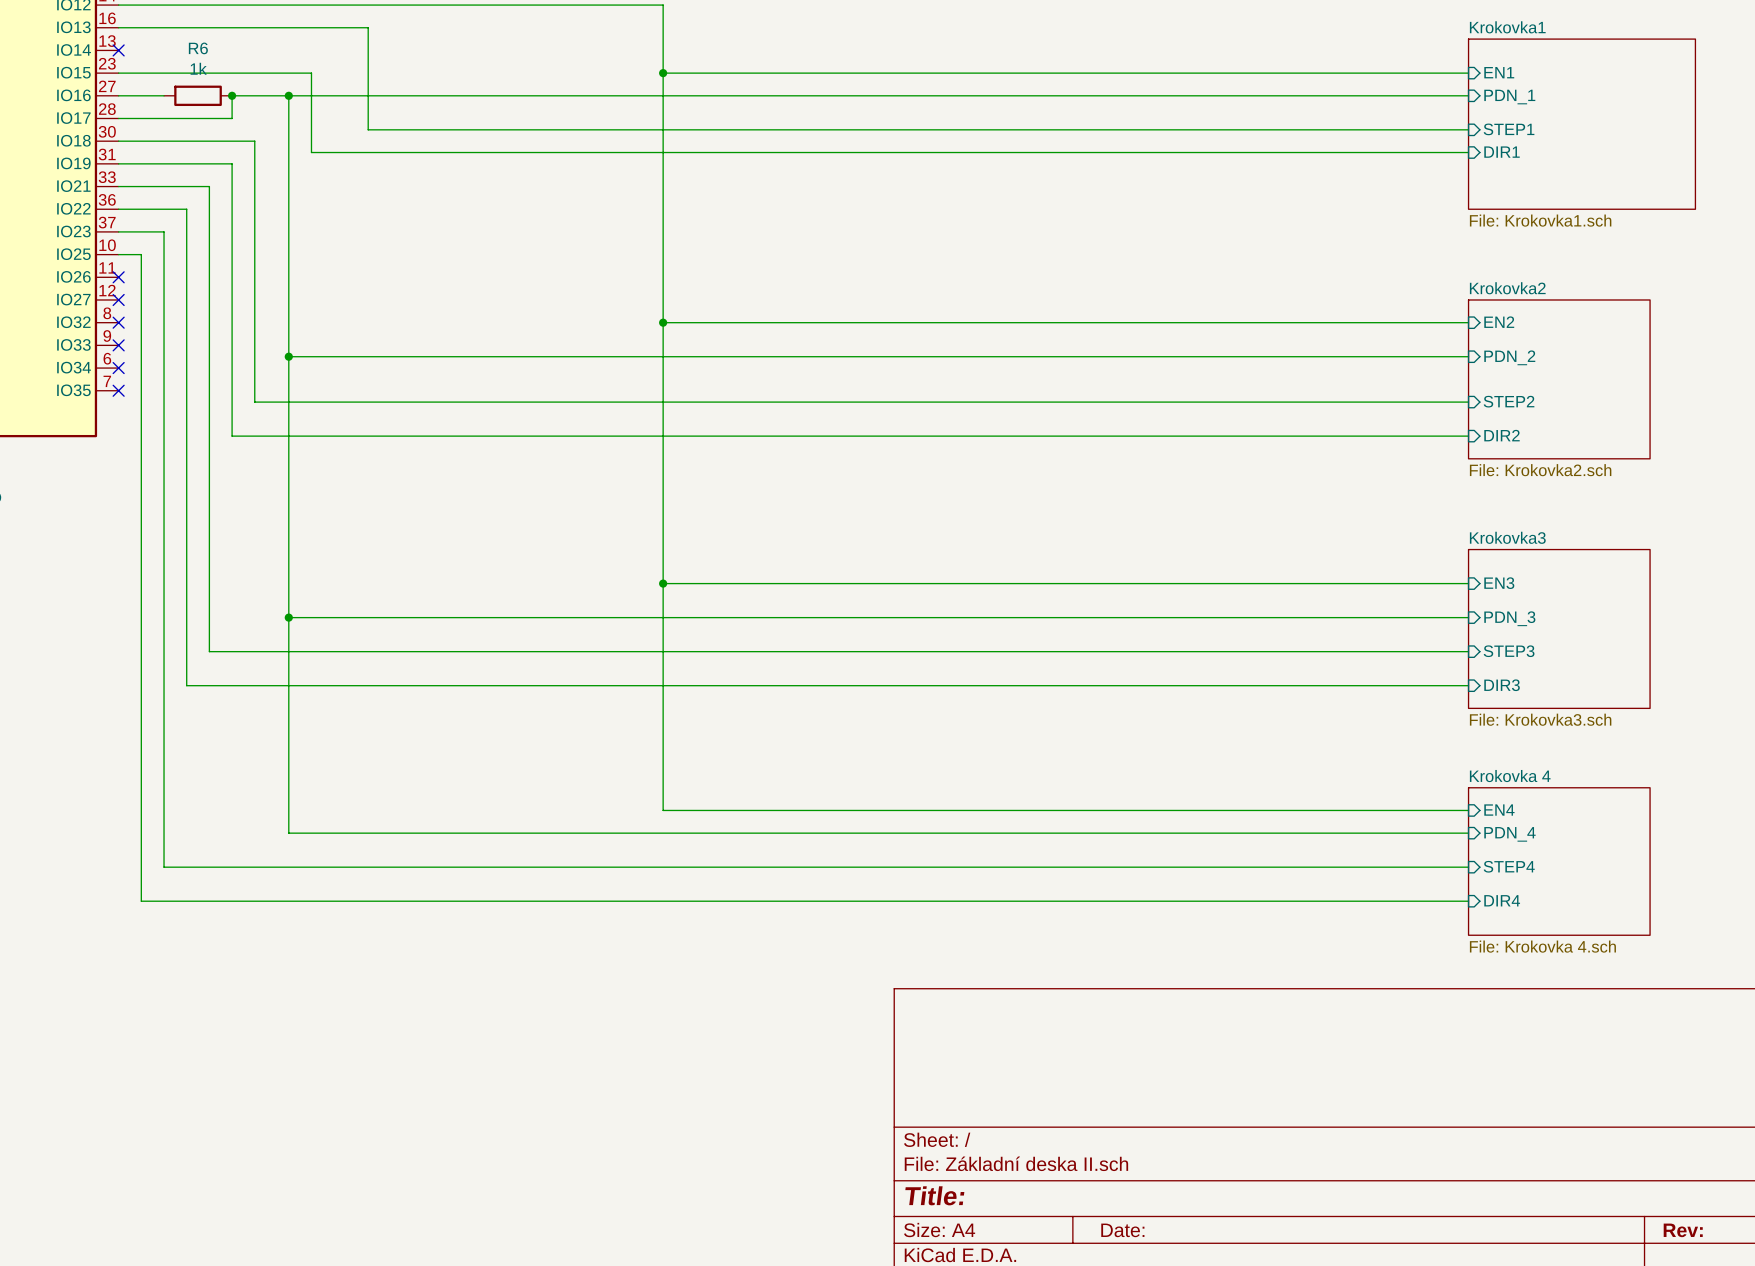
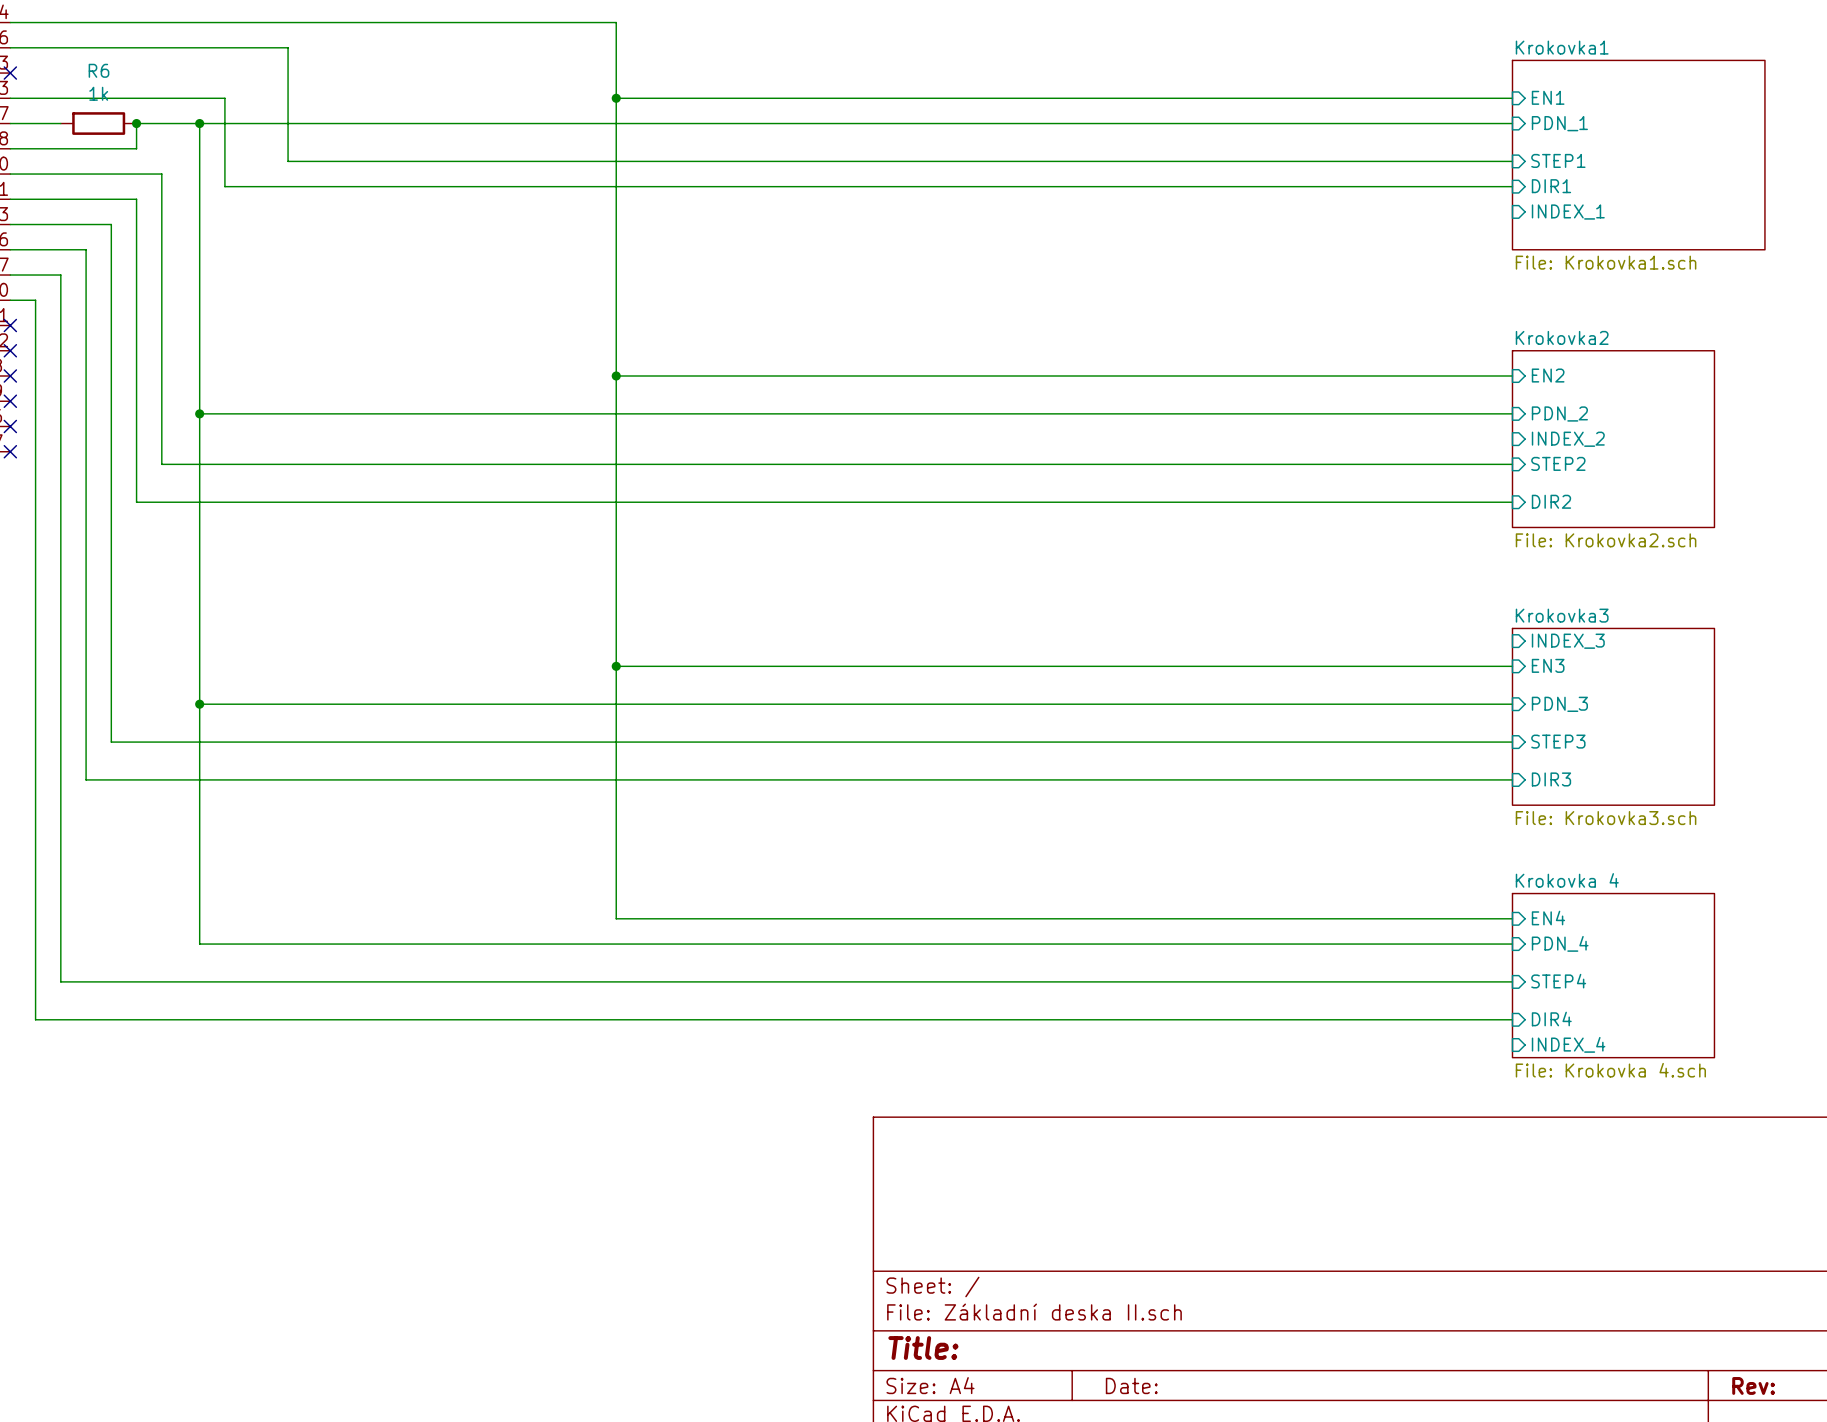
sheet pin: none -> INDEX_1 (1568, 212)
sheet pin: none -> INDEX_2 (1568, 439)
sheet pin: none -> INDEX_3 (1568, 641)
sheet pin: none -> INDEX_4 (1568, 1044)

